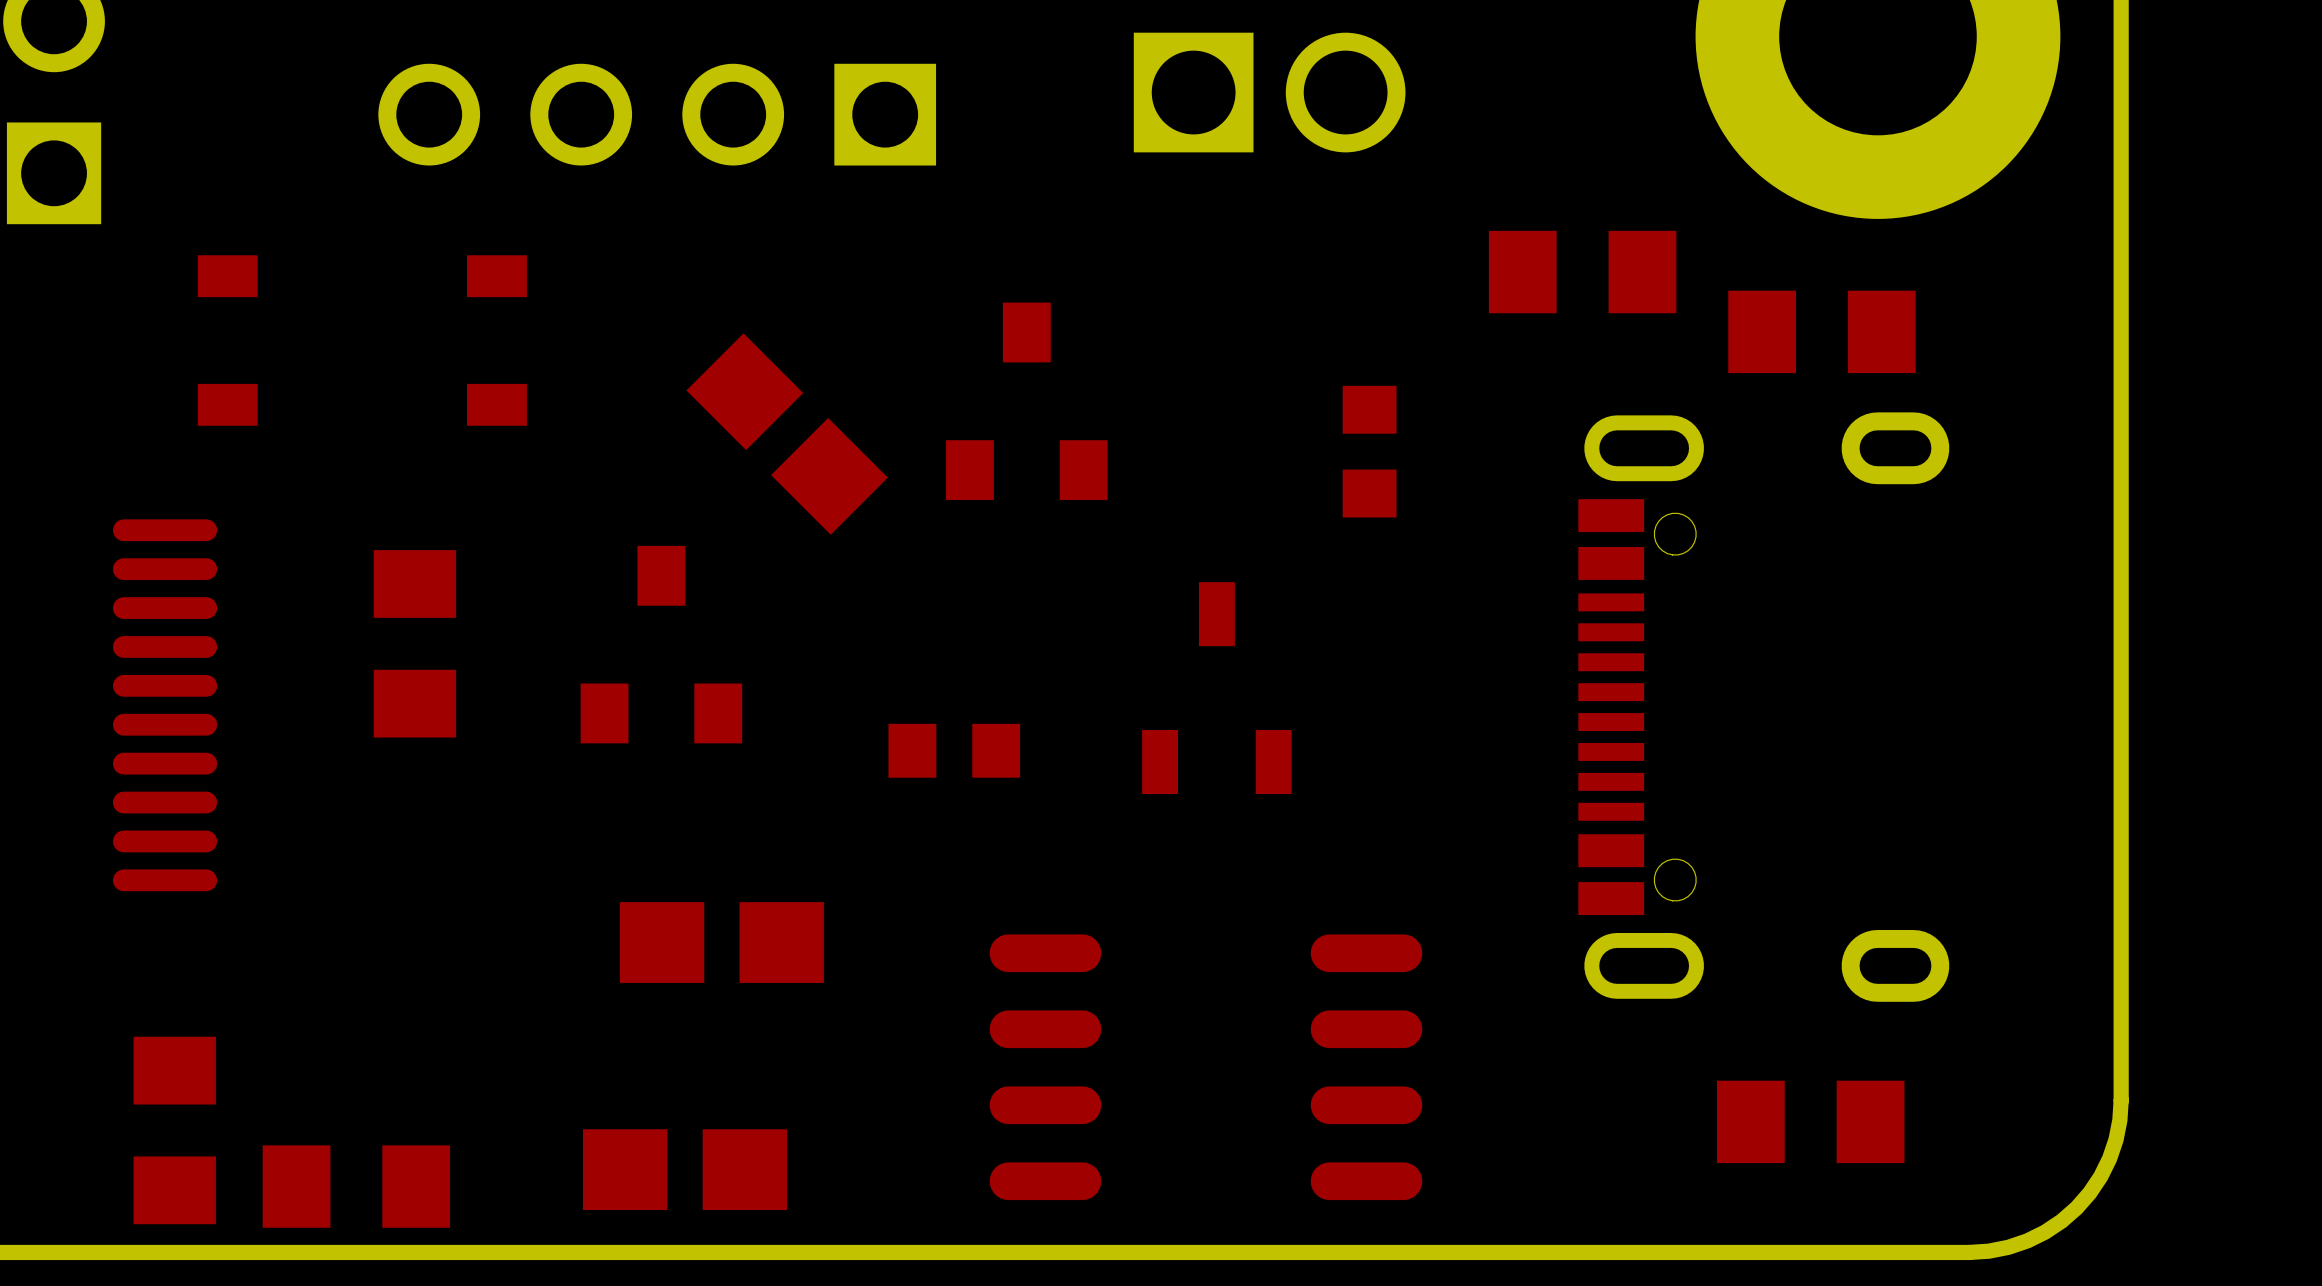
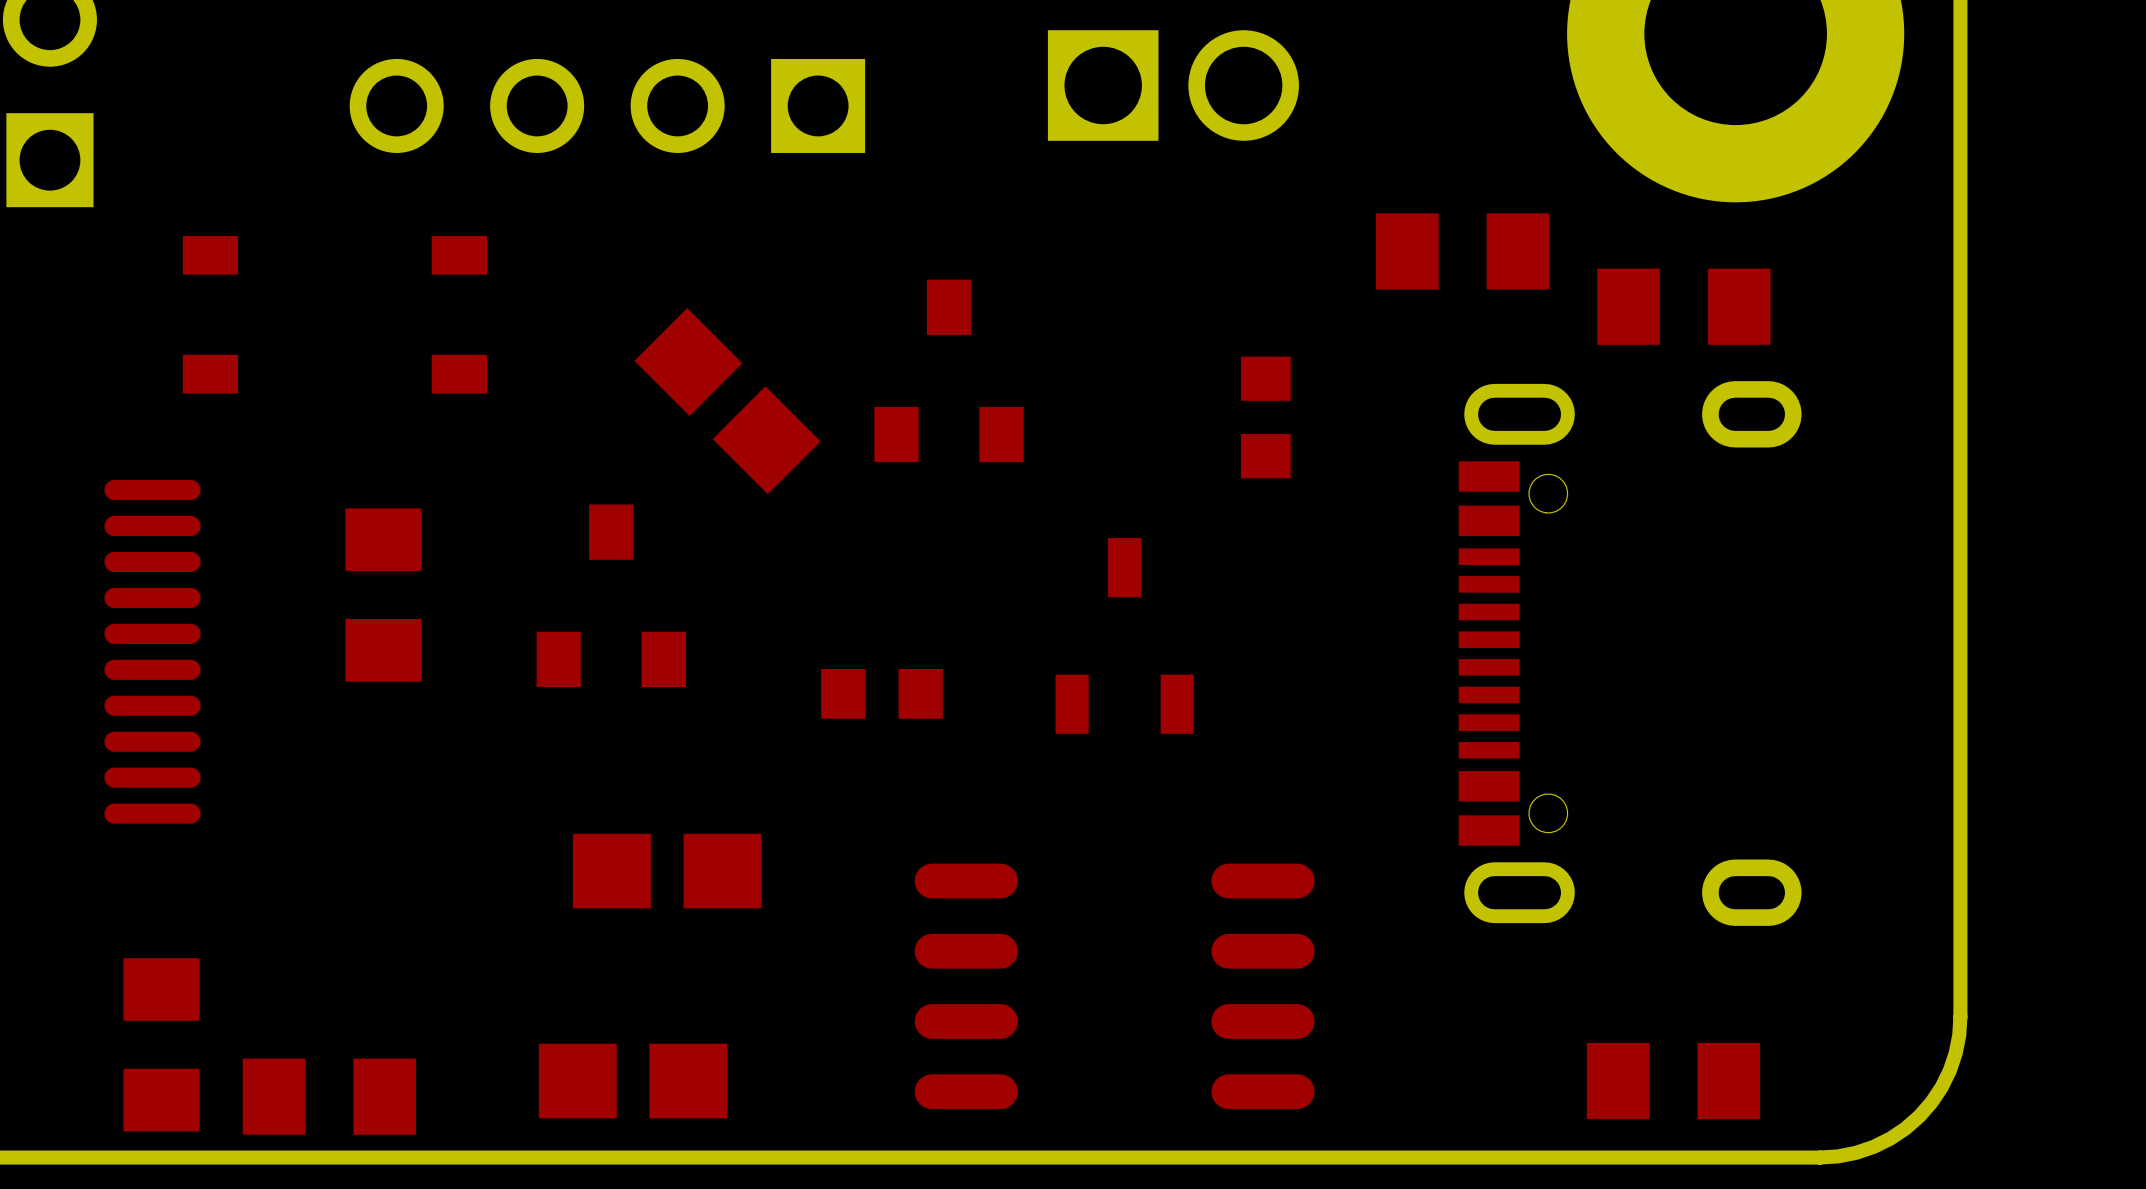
part position: (1810, 1121) -> (1673, 1081)

